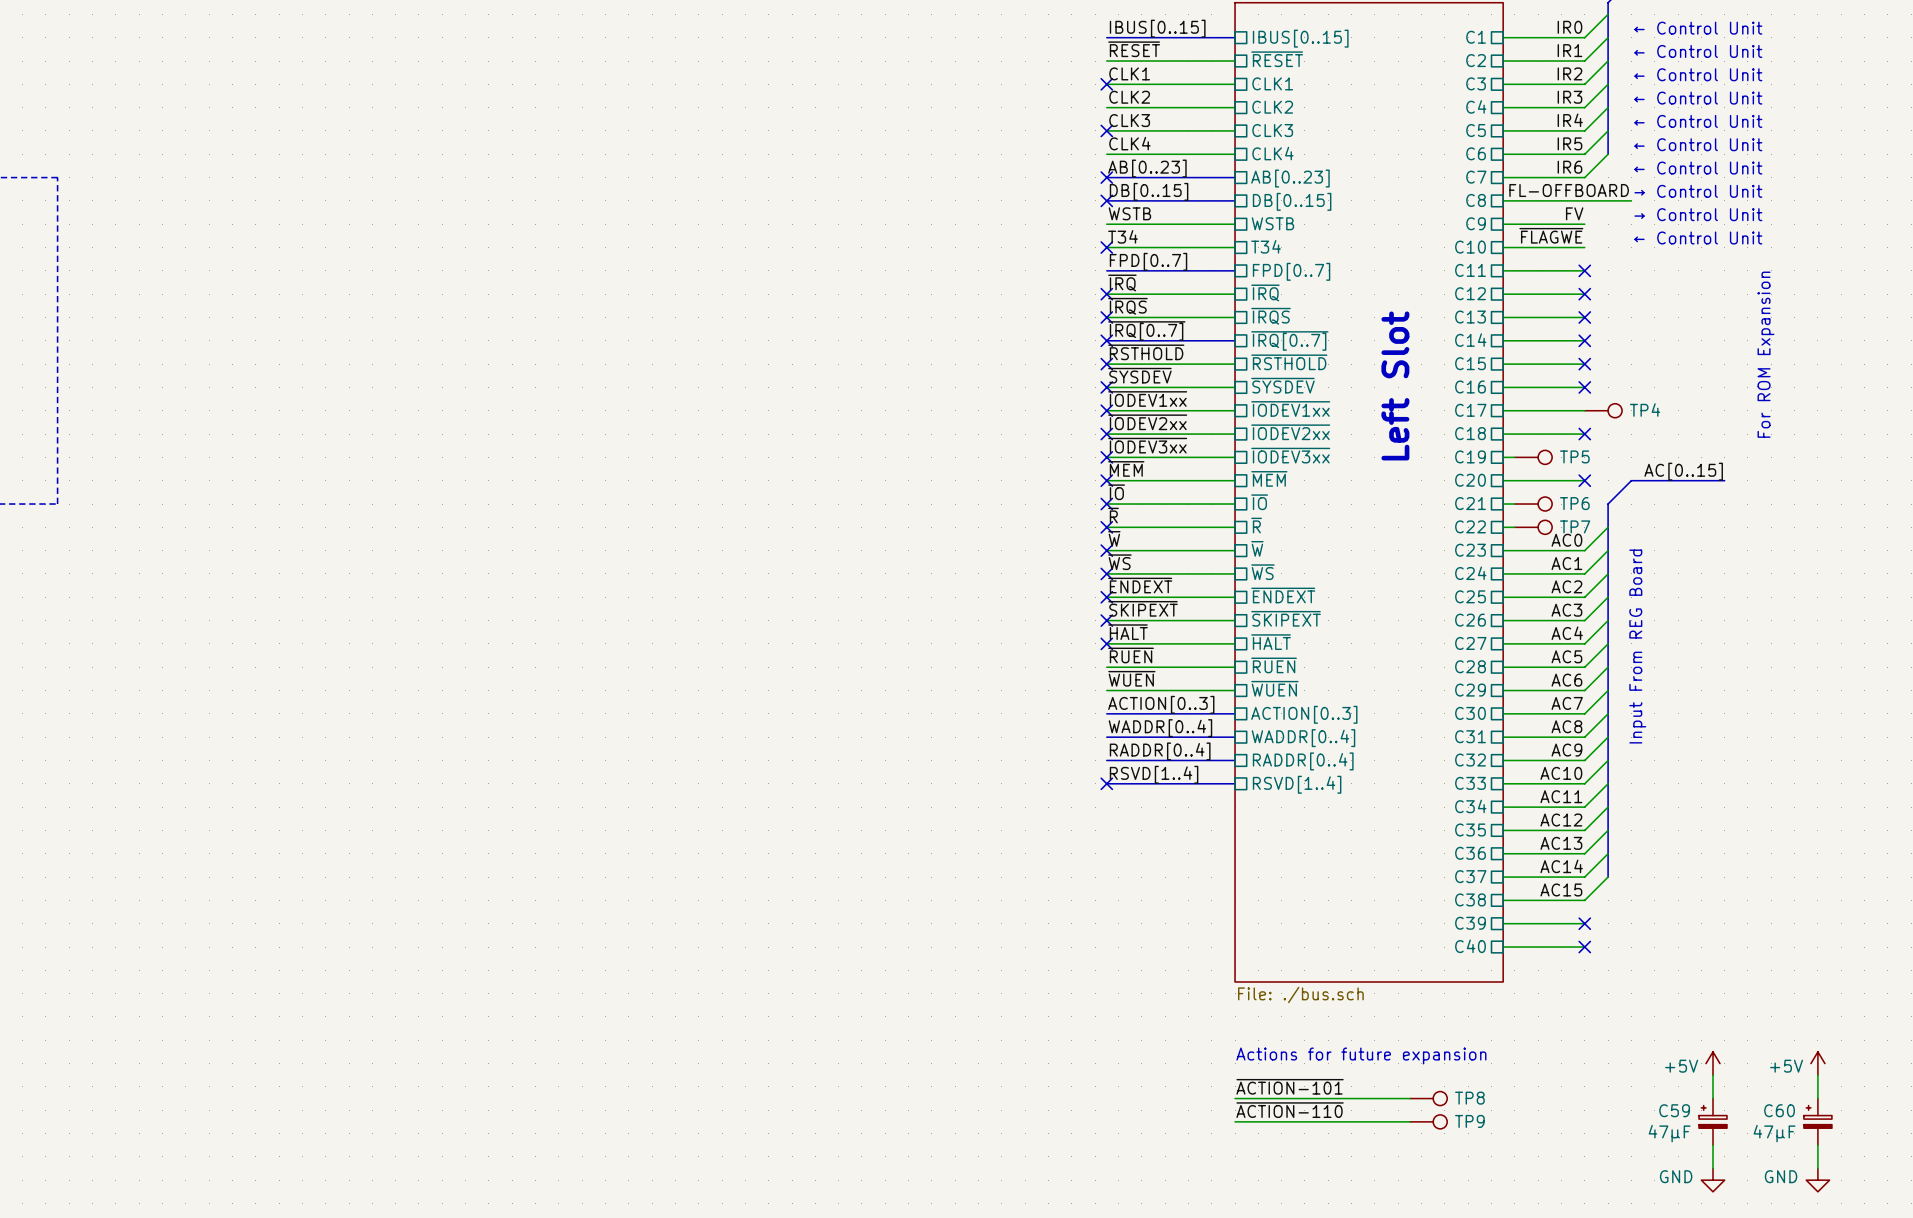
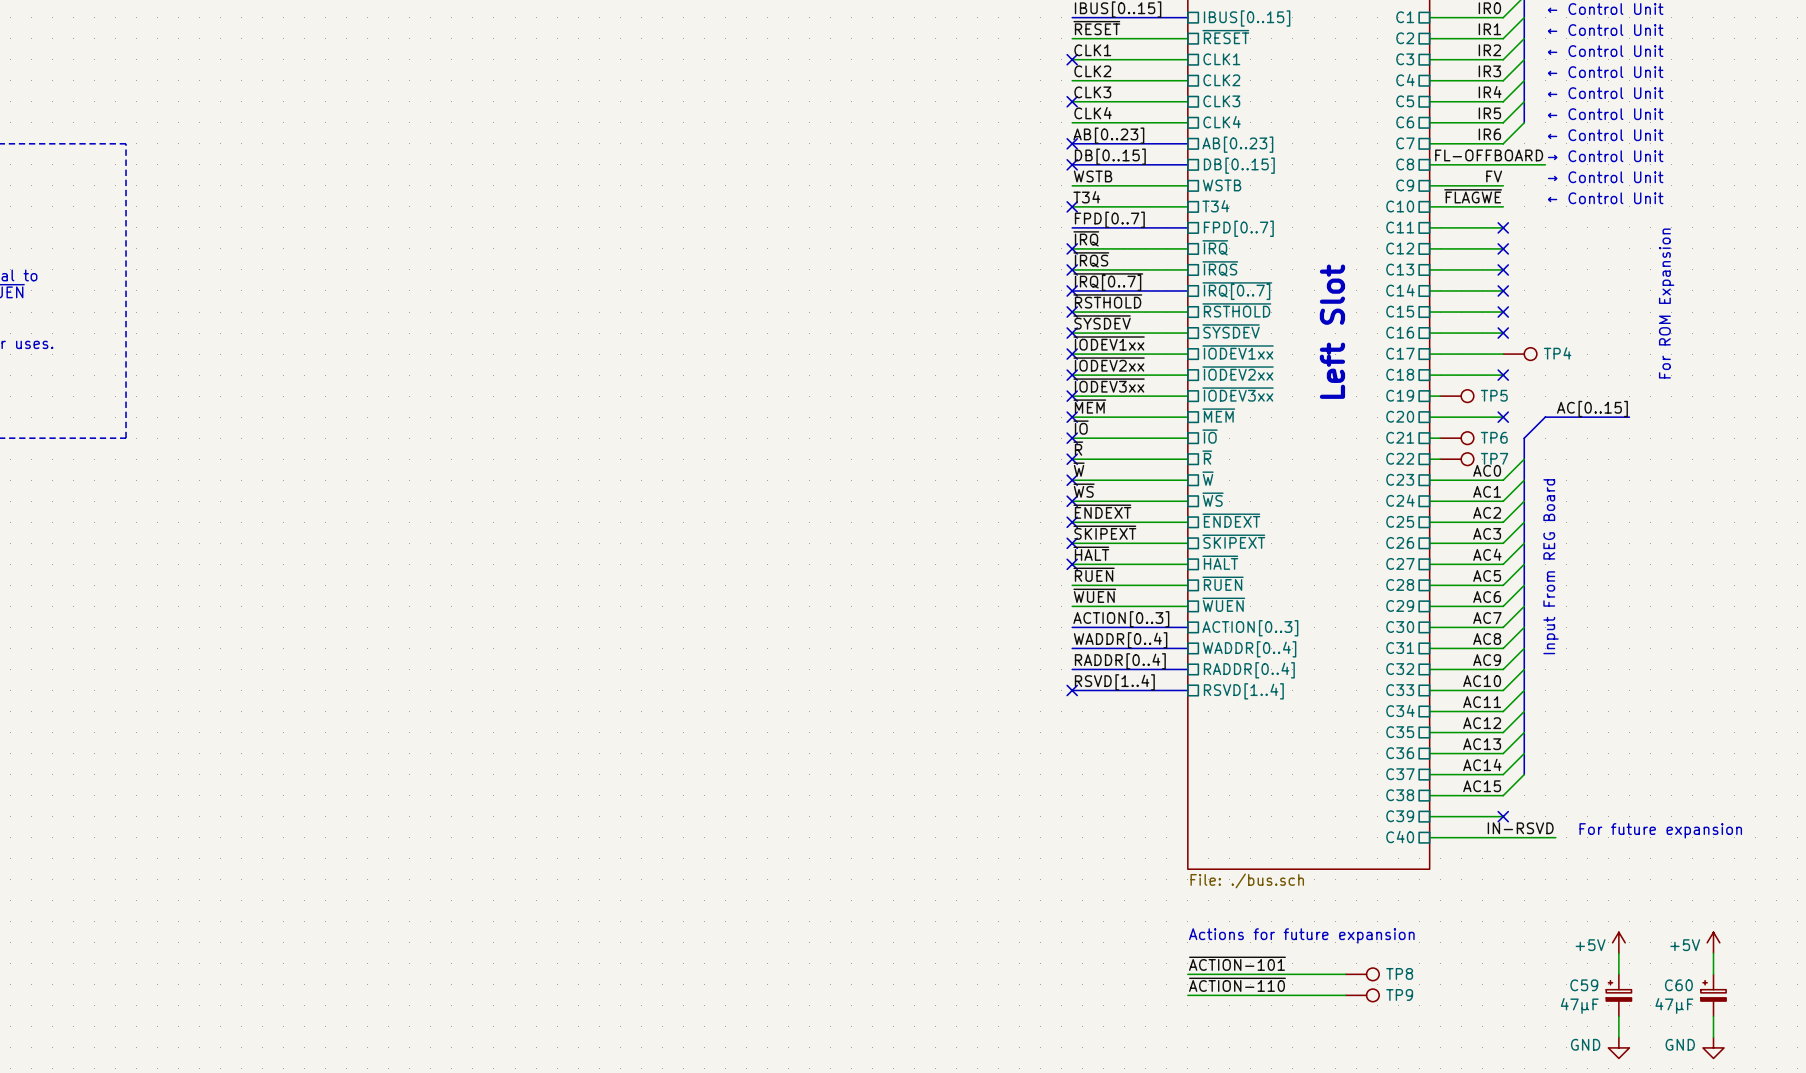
label: none -> IN-RSVD (1520, 828)
text: none -> For future expansion (1660, 830)
wire: none -> (1503, 837) (1555, 837)
no-connect mark: (1584, 947) -> none

